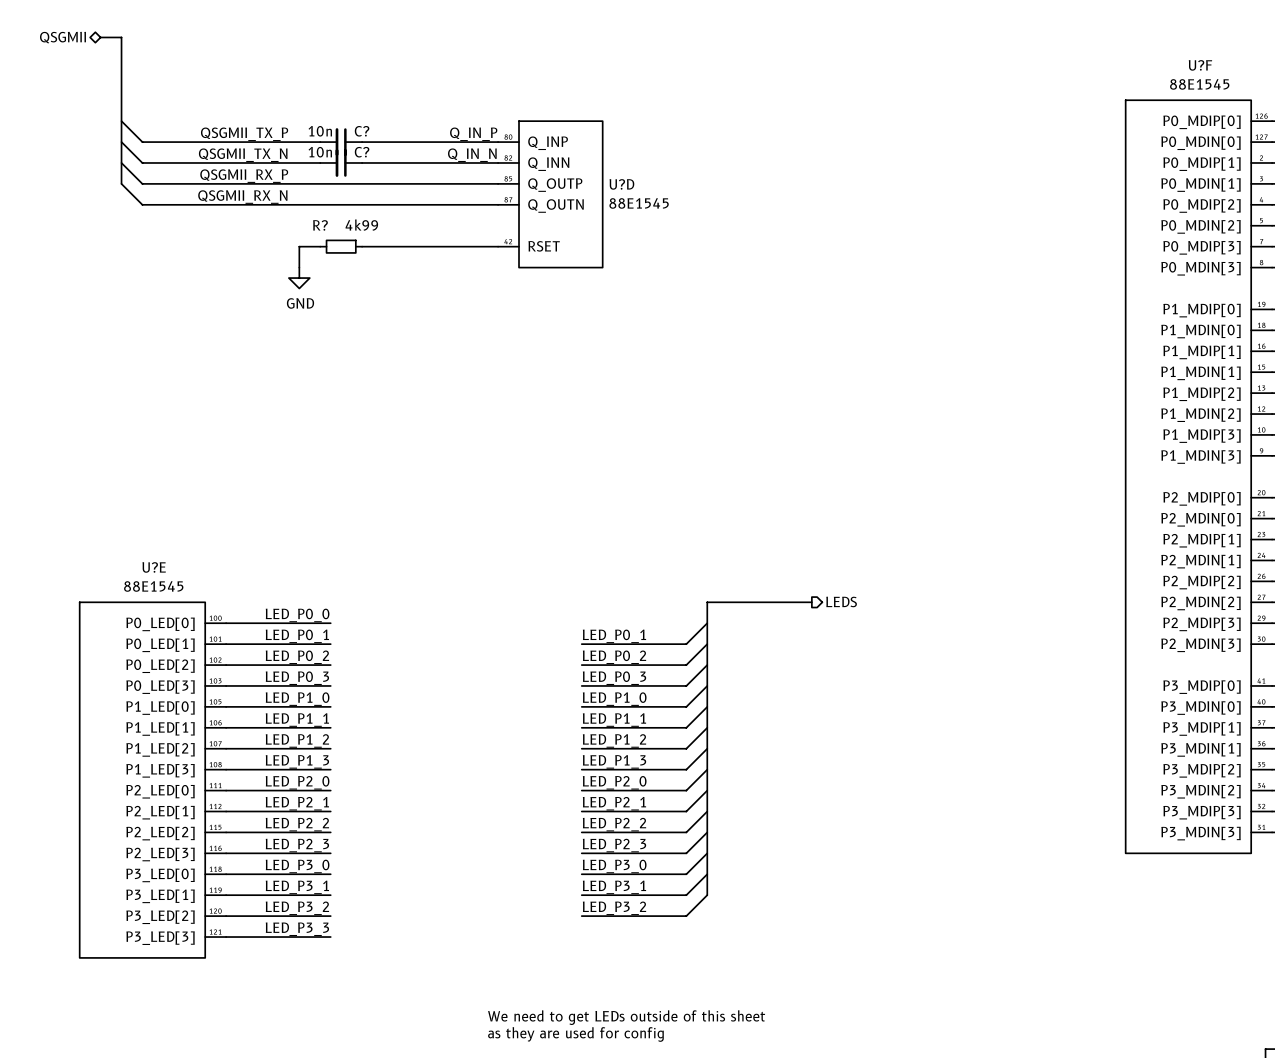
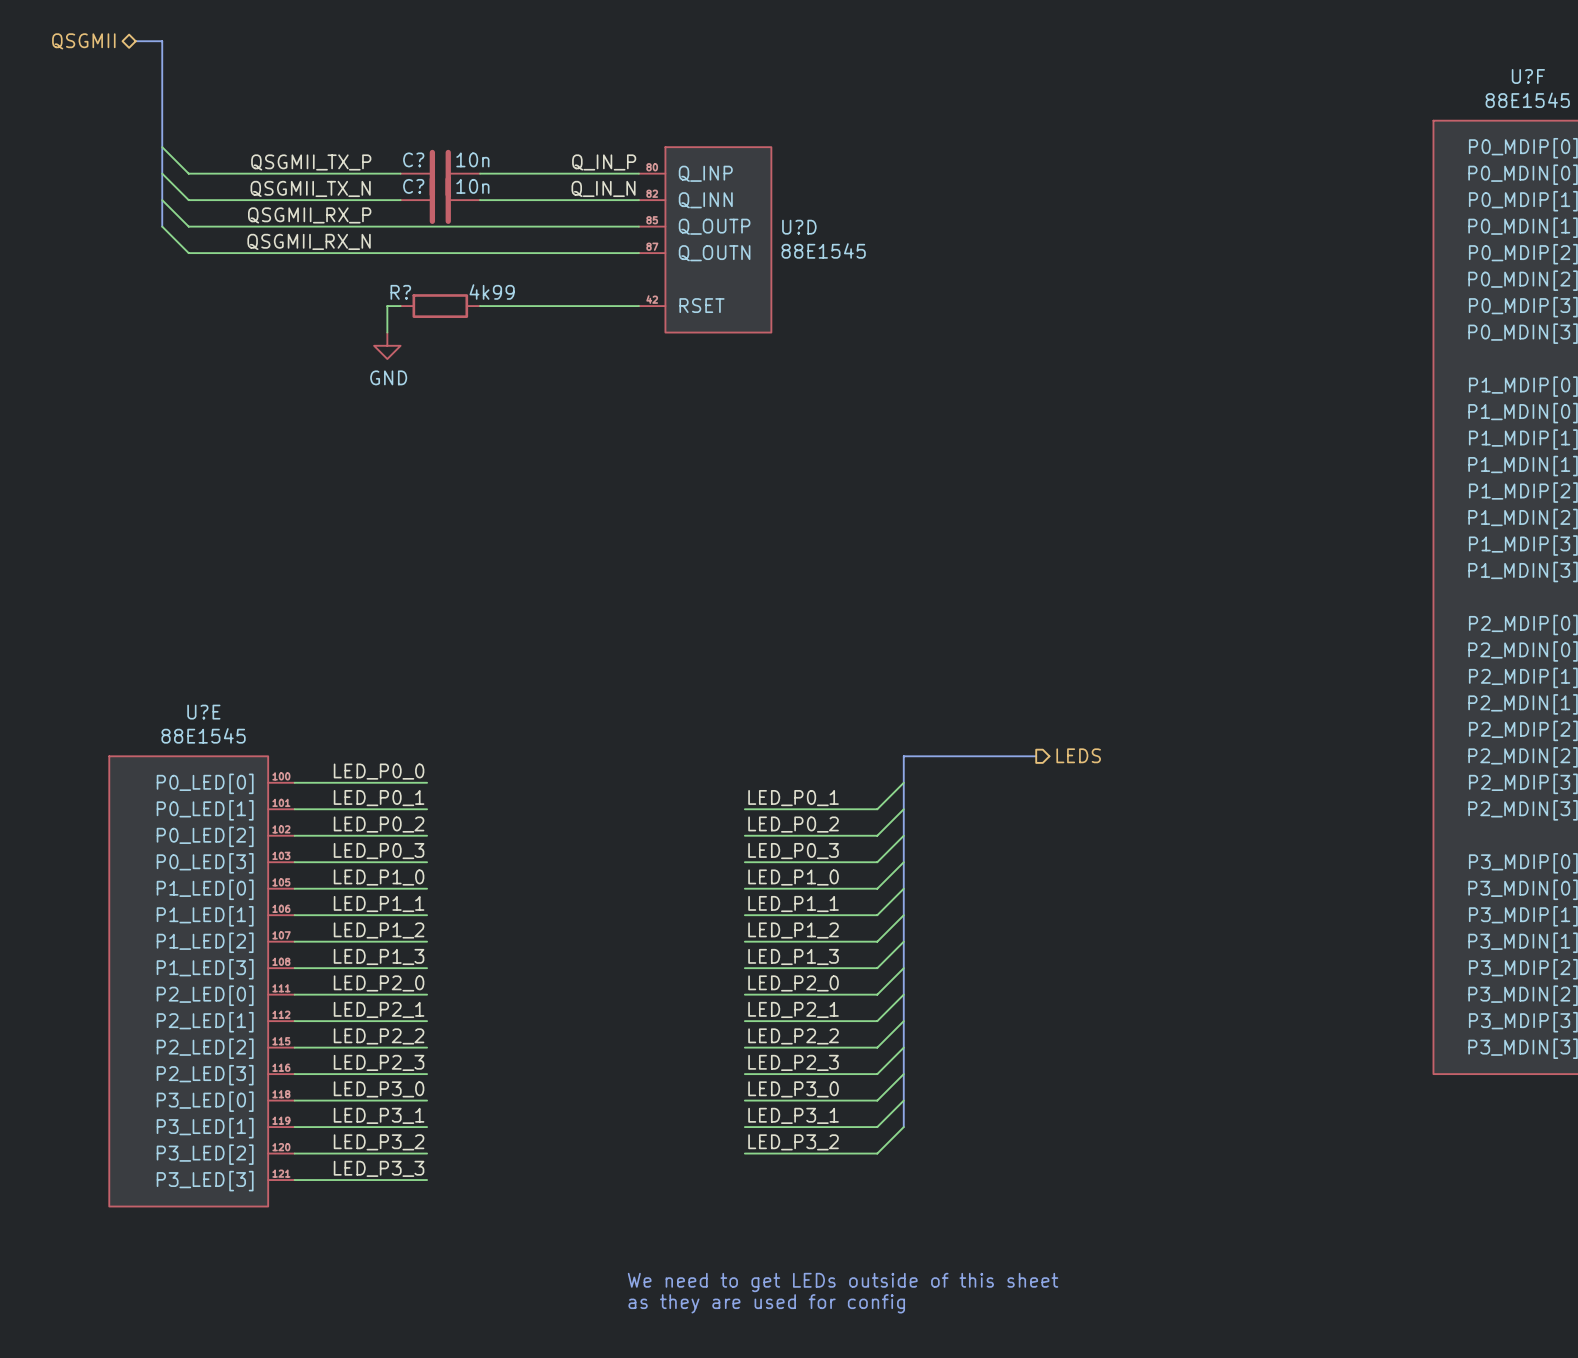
C? symbol: [320, 128, 363, 156] -> [400, 149, 481, 198]
C? value position: 10n (320, 131) -> 10n (472, 159)
C? name position: C? (362, 131) -> C? (413, 159)
C? symbol: [320, 149, 363, 177] -> [400, 176, 481, 224]
C? value position: 10n (320, 152) -> 10n (472, 186)
C? name position: C? (362, 152) -> C? (413, 186)
R? value position: 4k99 (361, 225) -> 4k99 (492, 292)
R? symbol: [320, 239, 363, 254] -> [400, 294, 481, 318]

